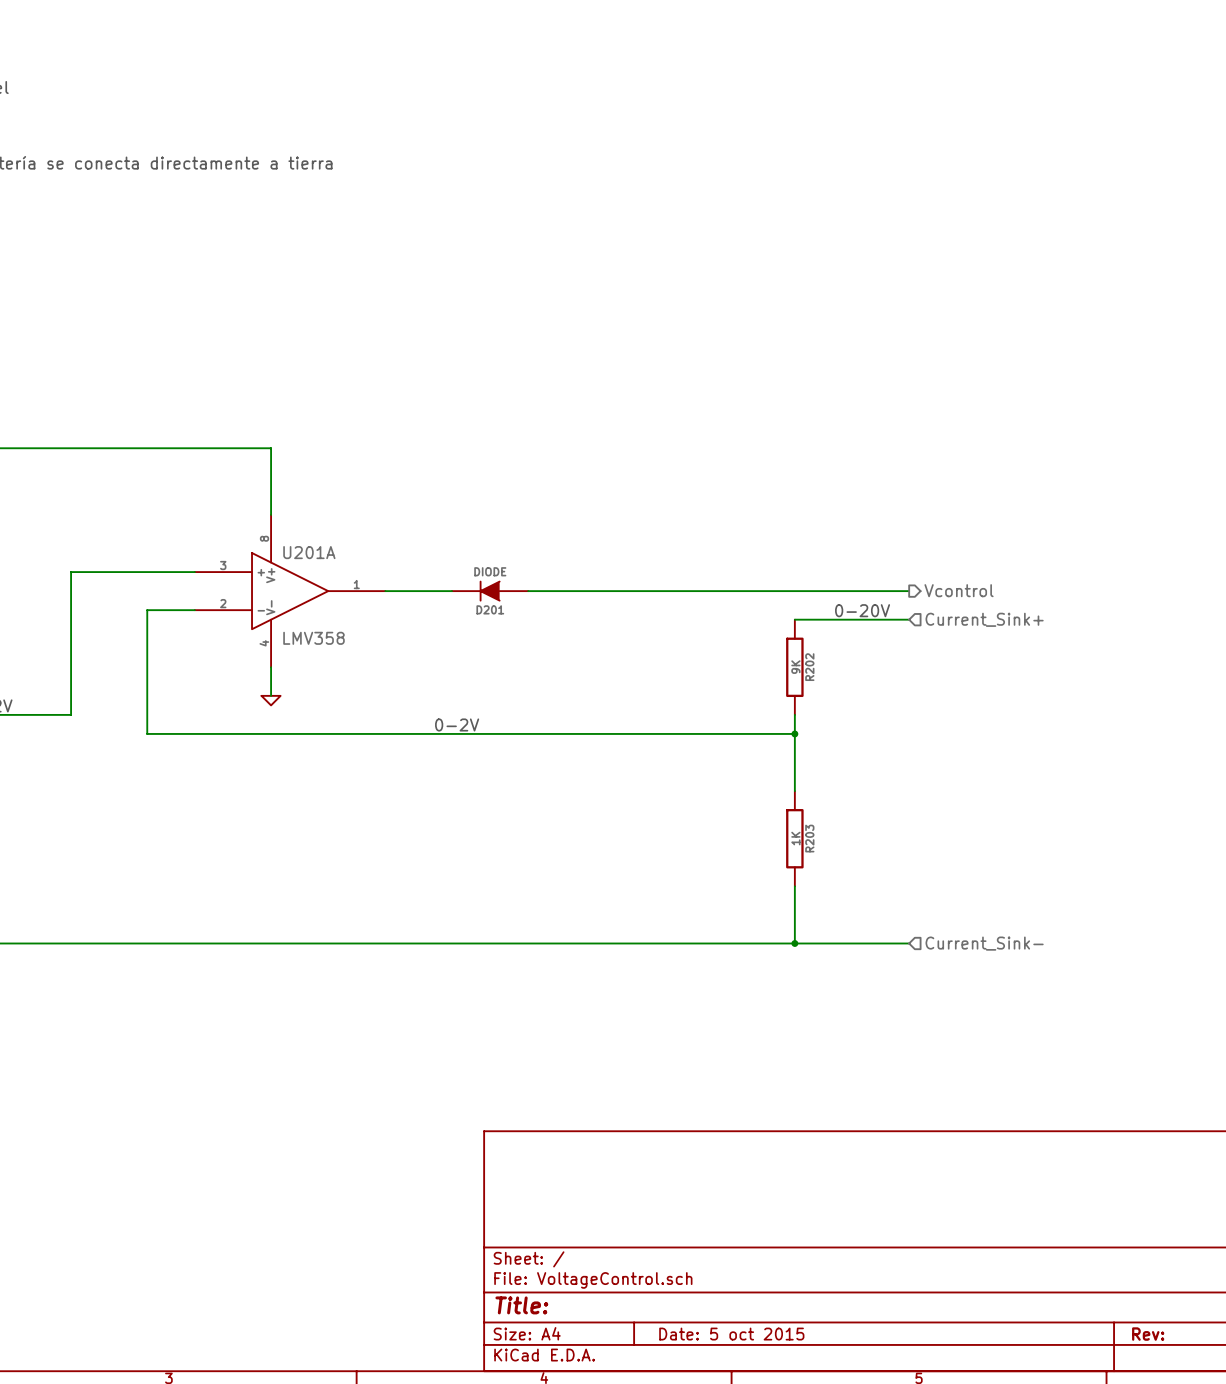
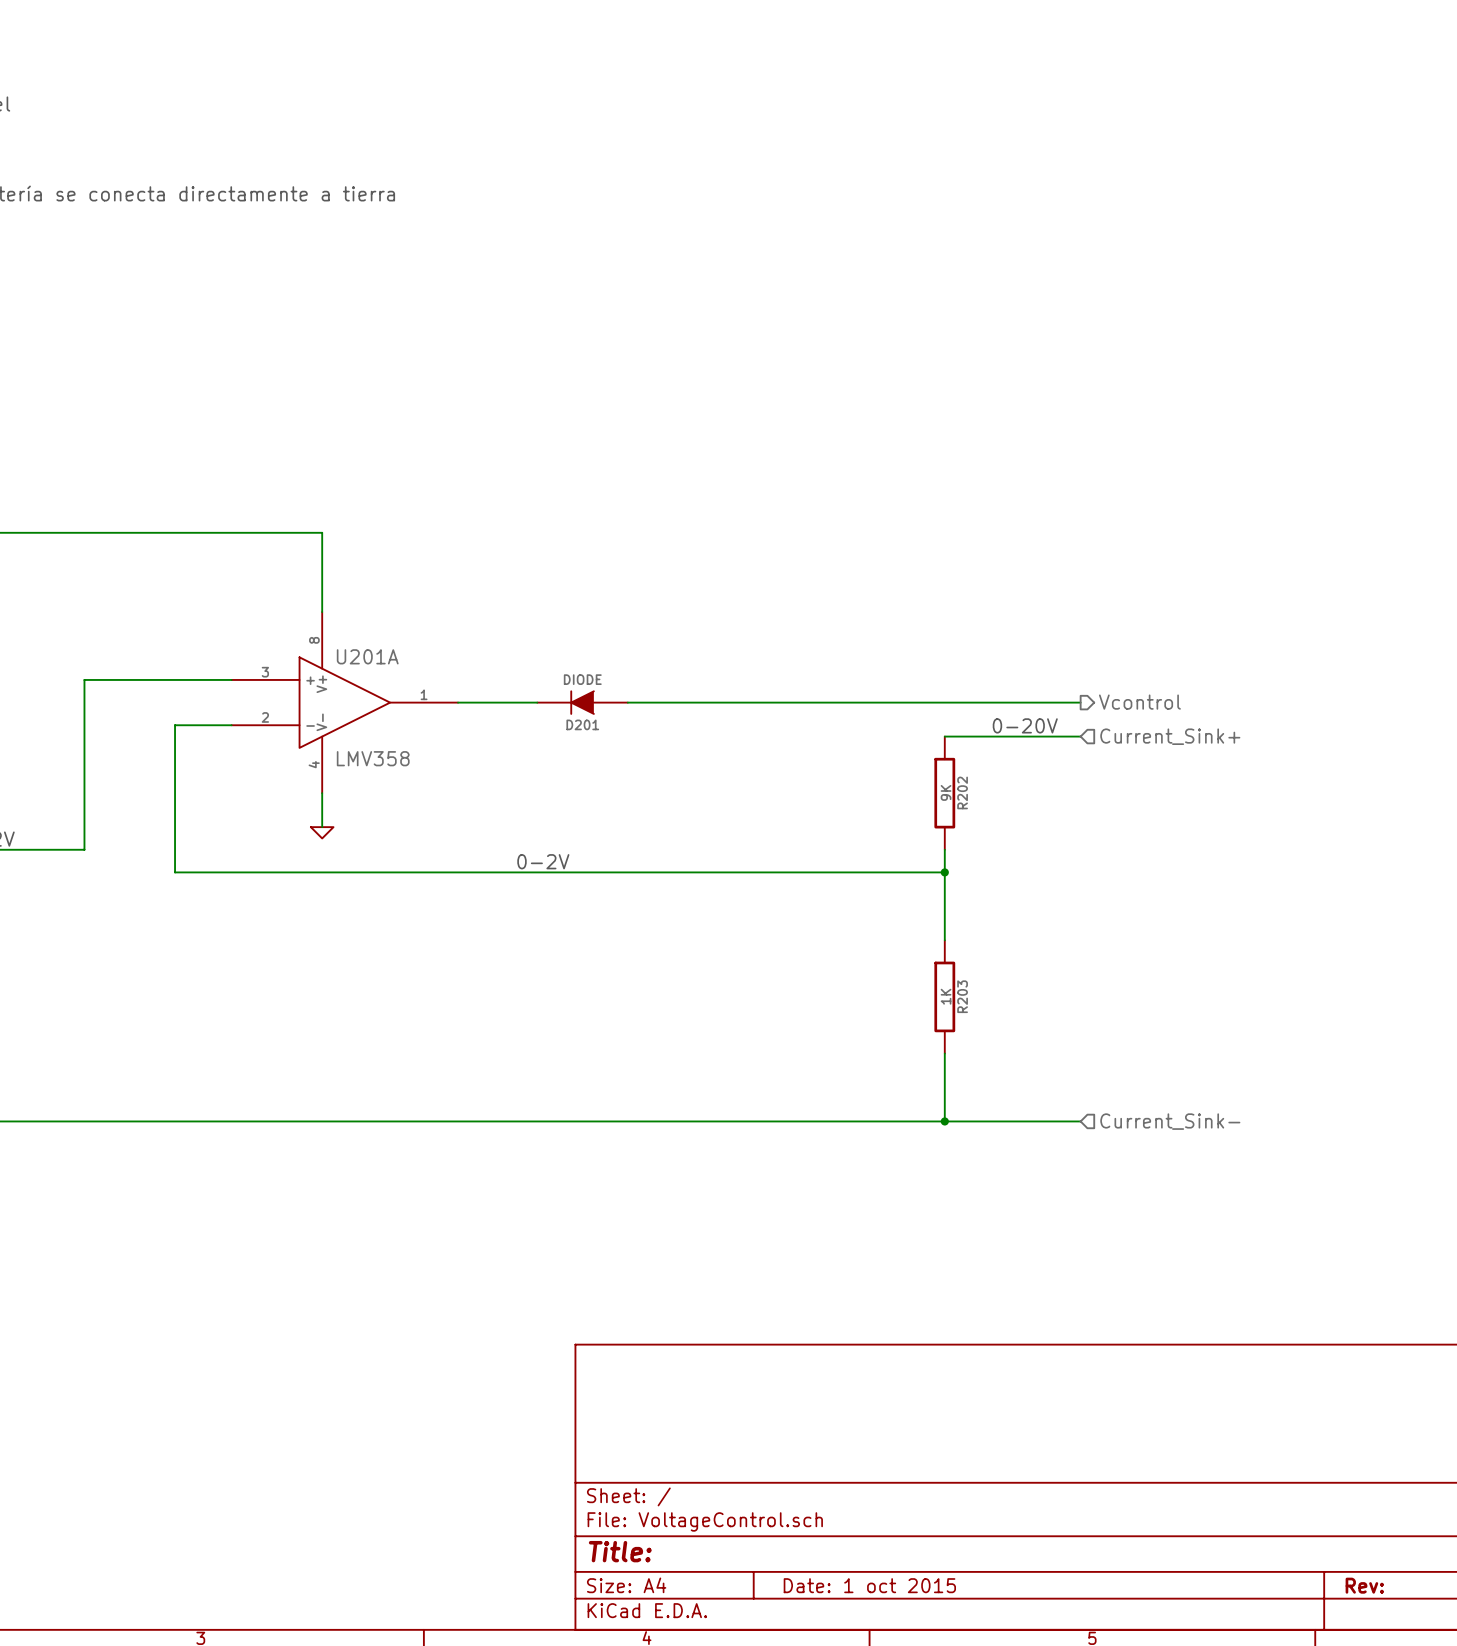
title block: Date: 5 oct 2015 (731, 1334) -> Date: 1 oct 2015 (869, 1585)

